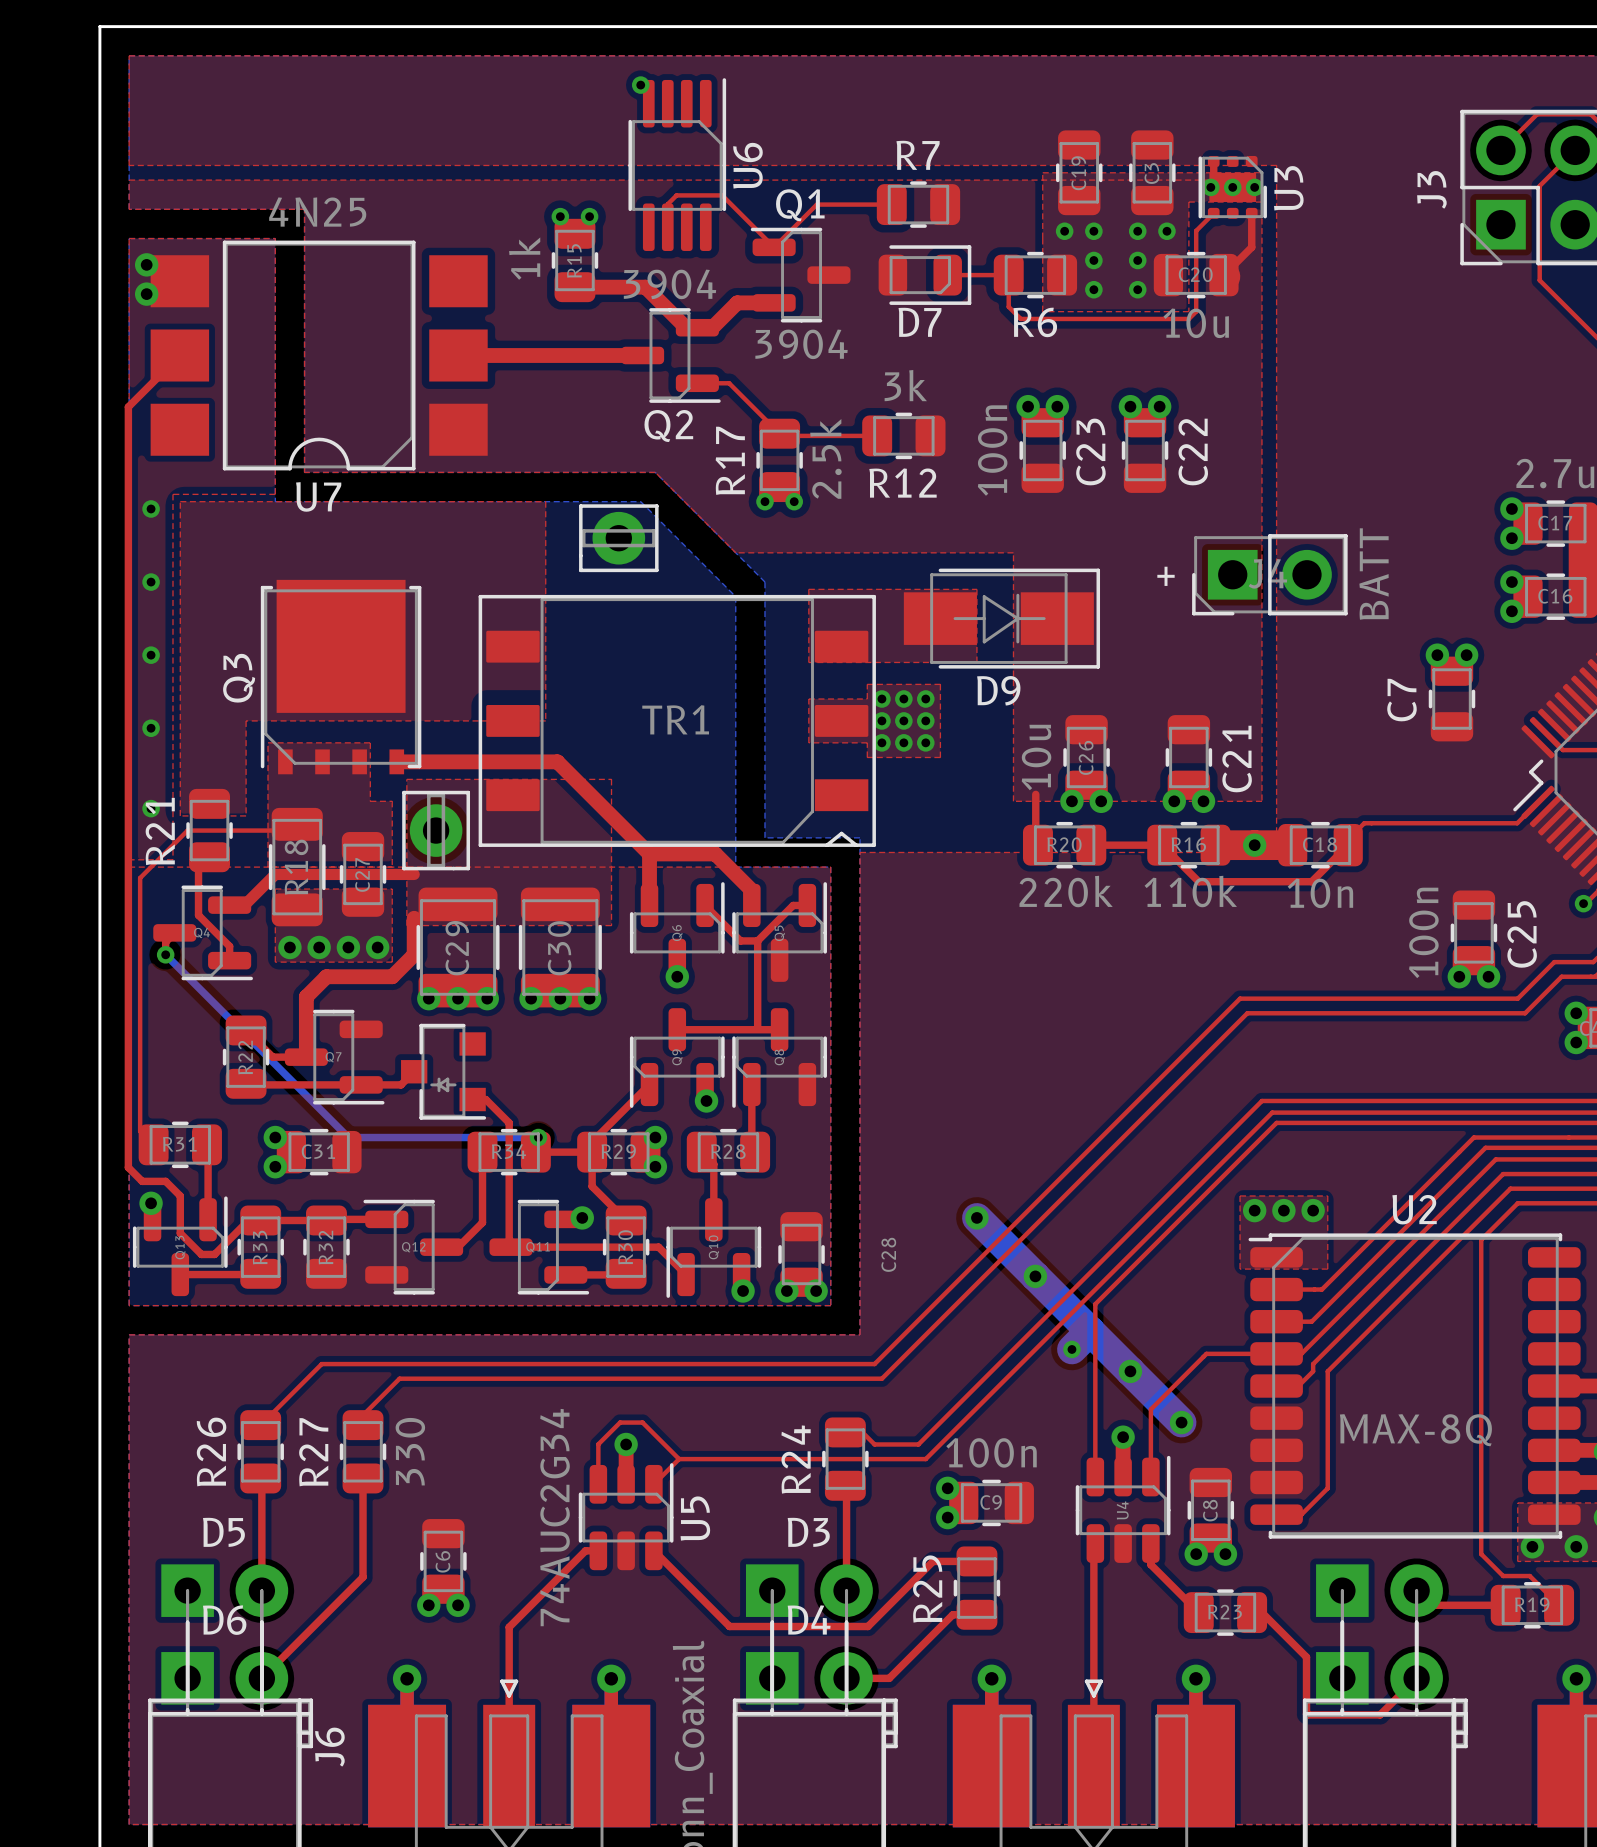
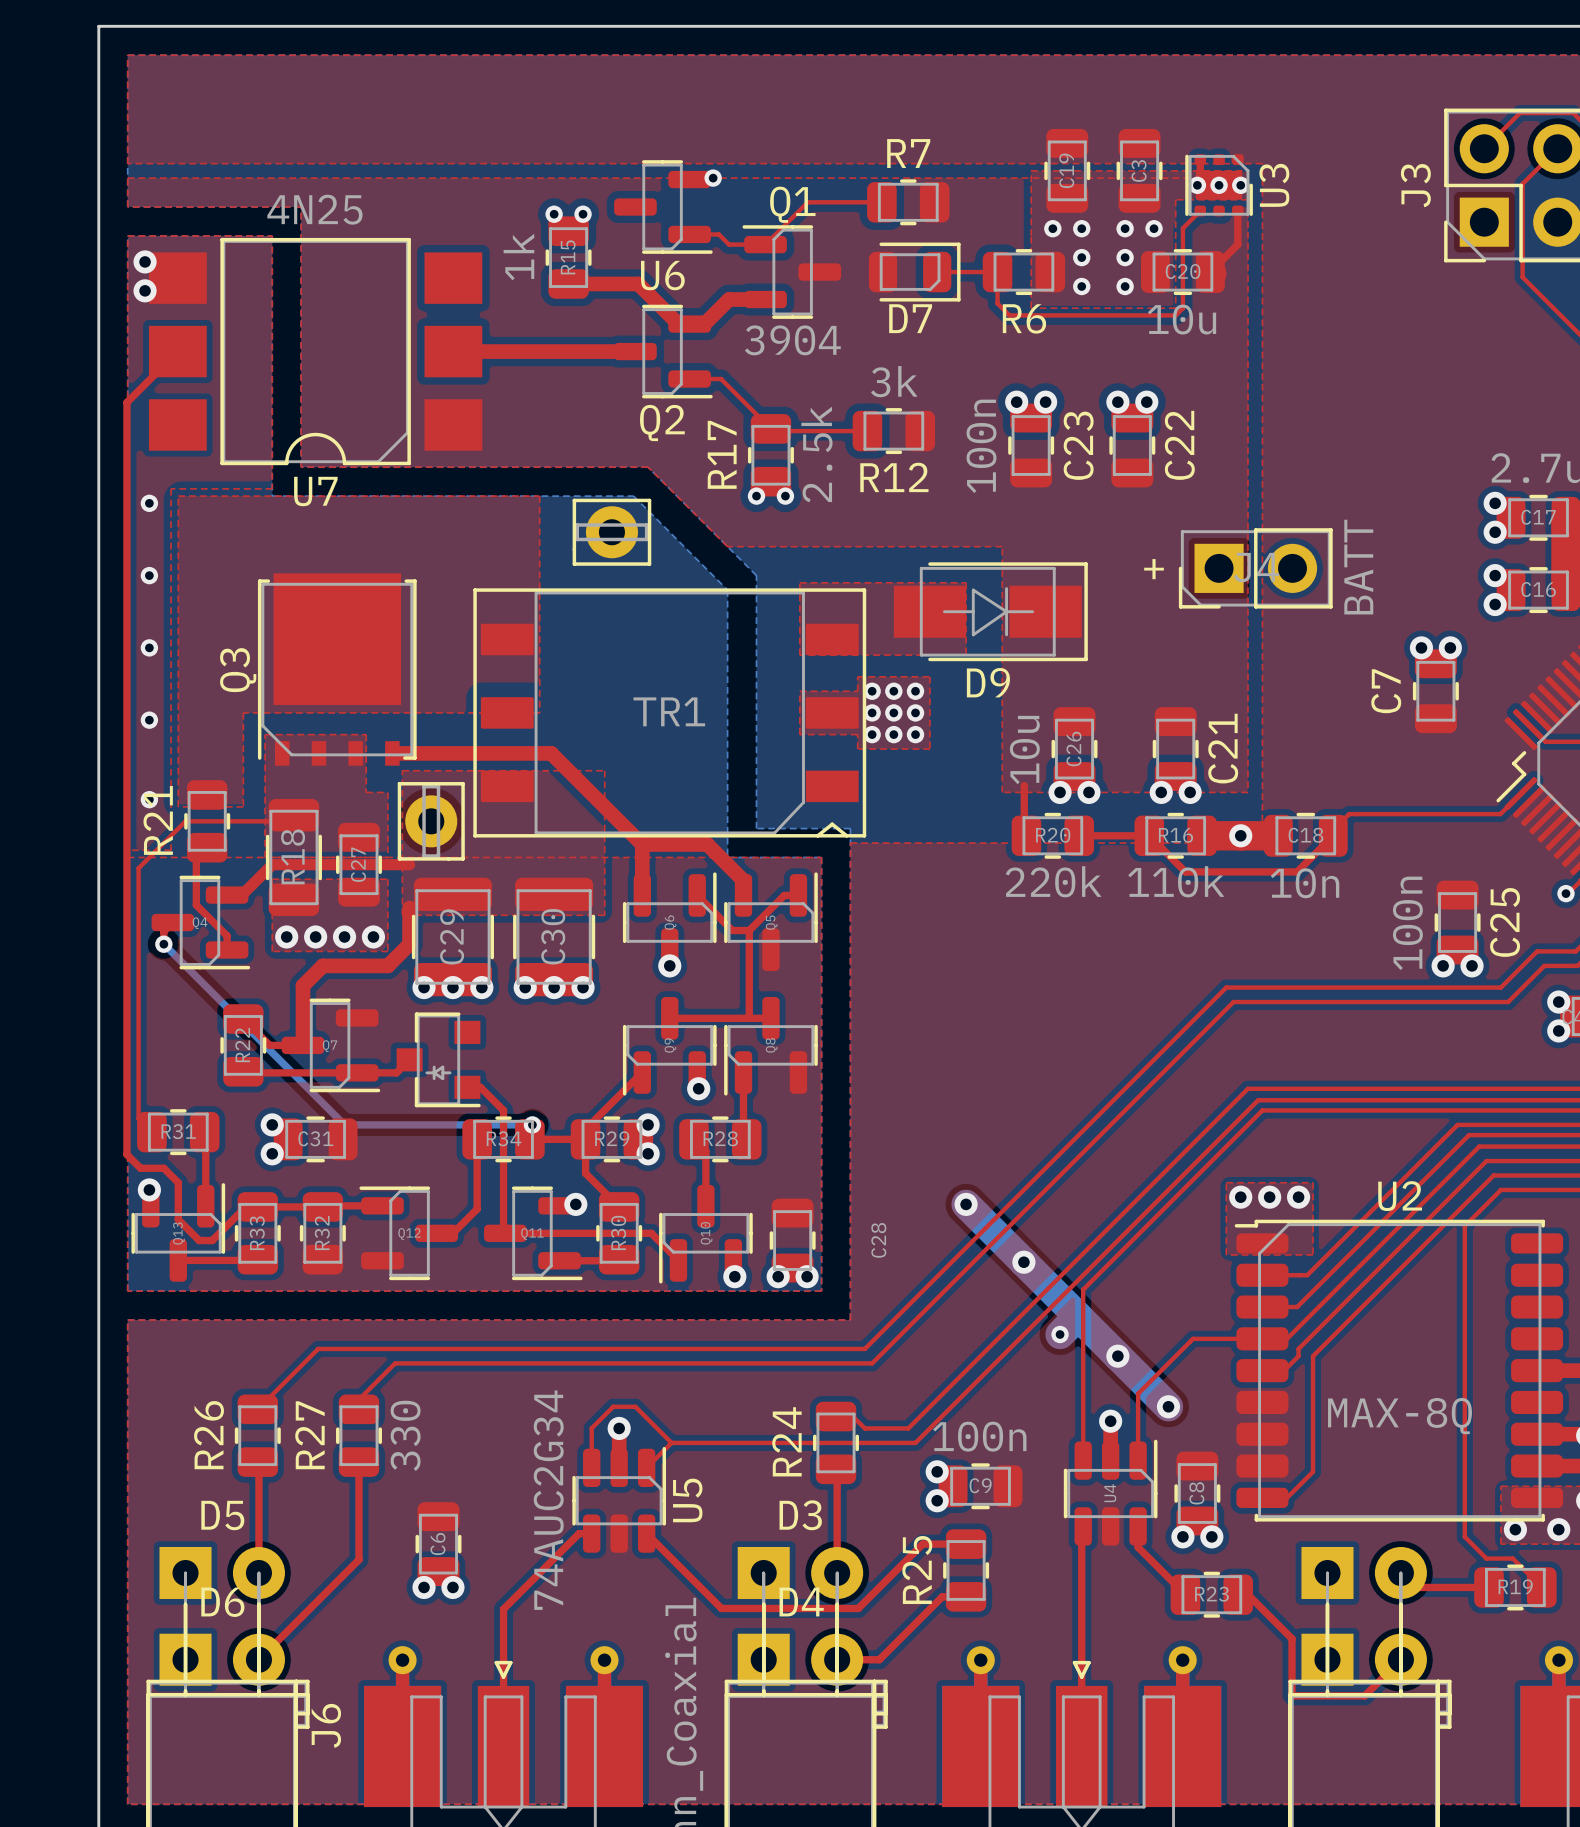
U6 footprint: [628, 78, 727, 251] -> [614, 160, 713, 254]
via position: (640, 85) -> (713, 178)
U6 name position: U6 (747, 165) -> U6 (662, 275)
top track: (667, 227) (667, 204) (676, 195) (722, 195) (774, 247) -> (689, 234) (718, 234) (729, 244) (765, 244)
Q2 value: 3904 (669, 284) -> none

